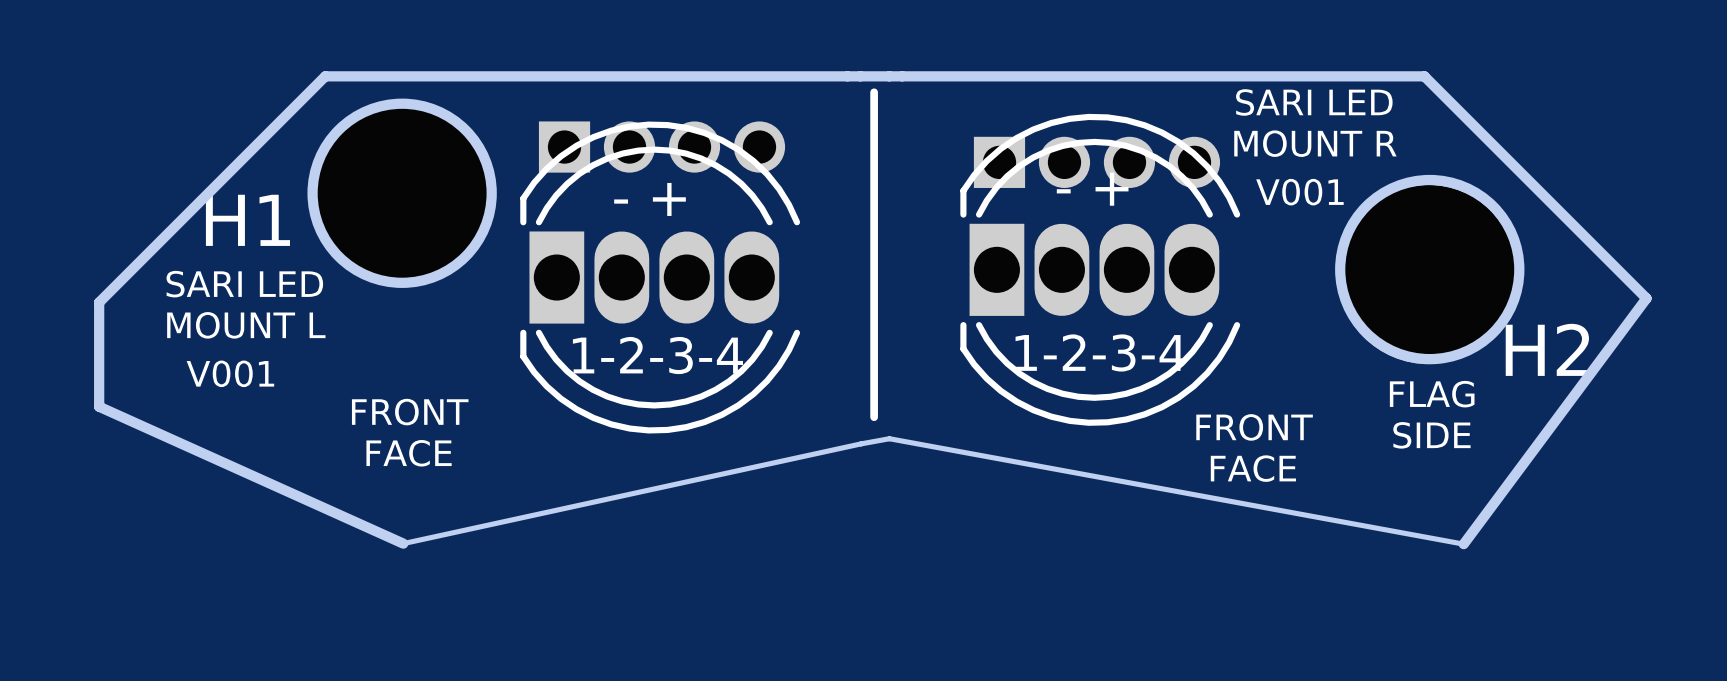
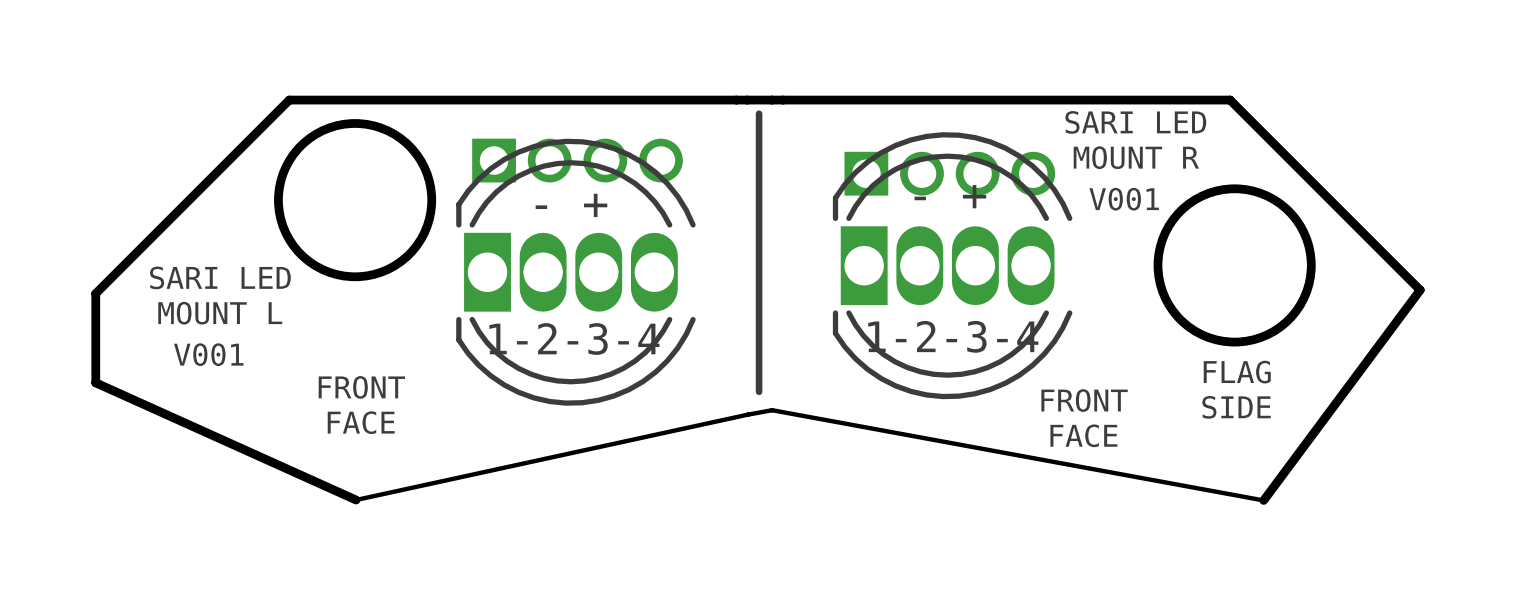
H1: (400, 192) -> none
H2: (1428, 273) -> none

